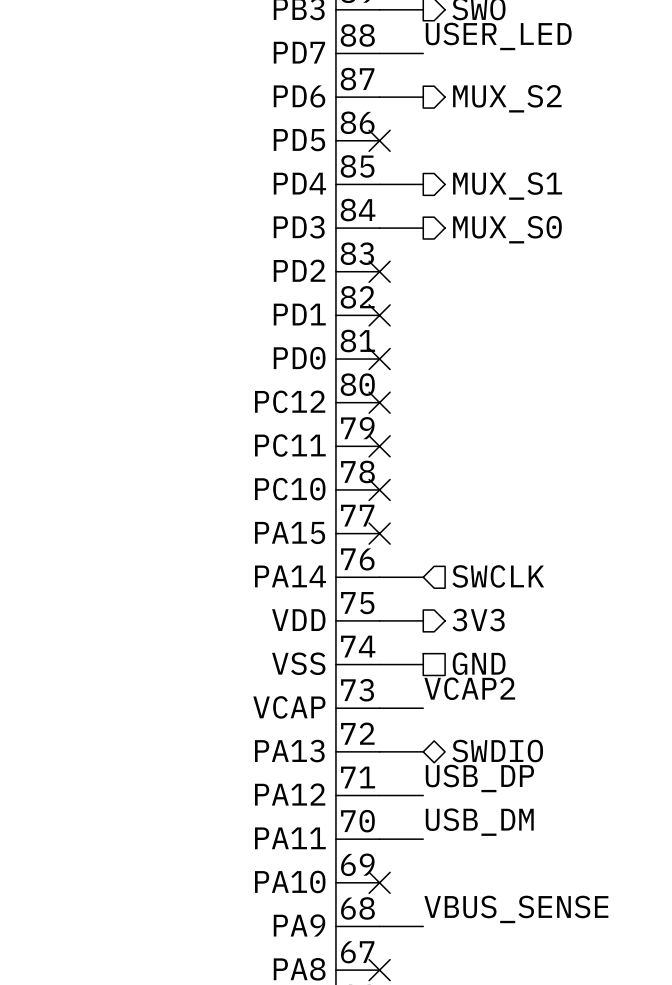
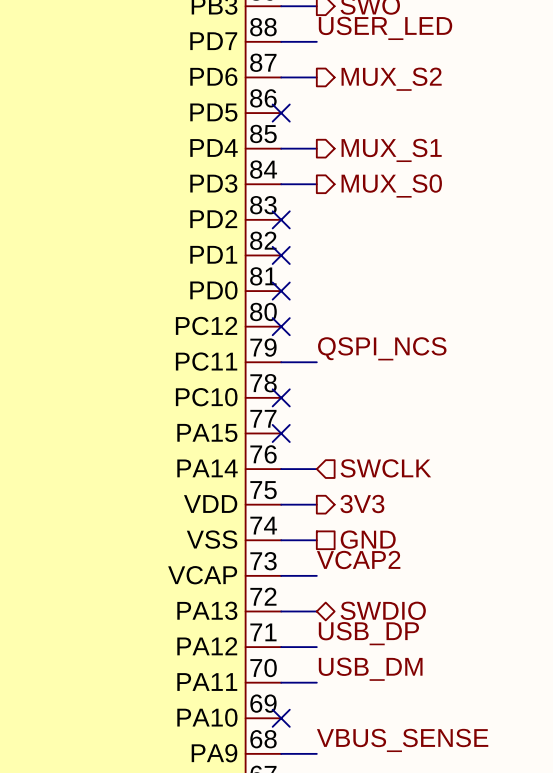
label: none -> QSPI_NCS (382, 348)
wire: none -> (281, 362) (316, 362)
no-connect mark: (379, 446) -> none

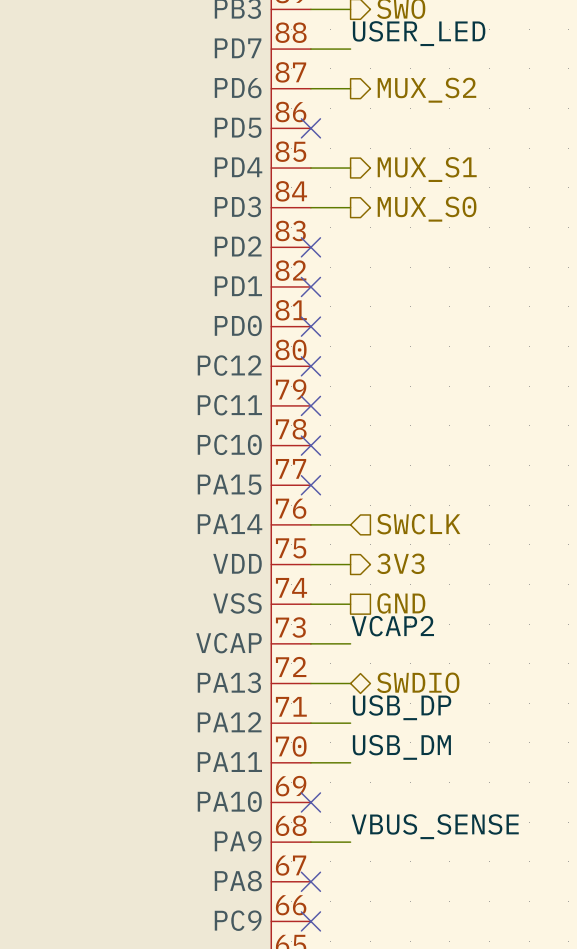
label: QSPI_NCS (382, 348) -> none
wire: (281, 362) (316, 362) -> none
no-connect mark: none -> (310, 405)

